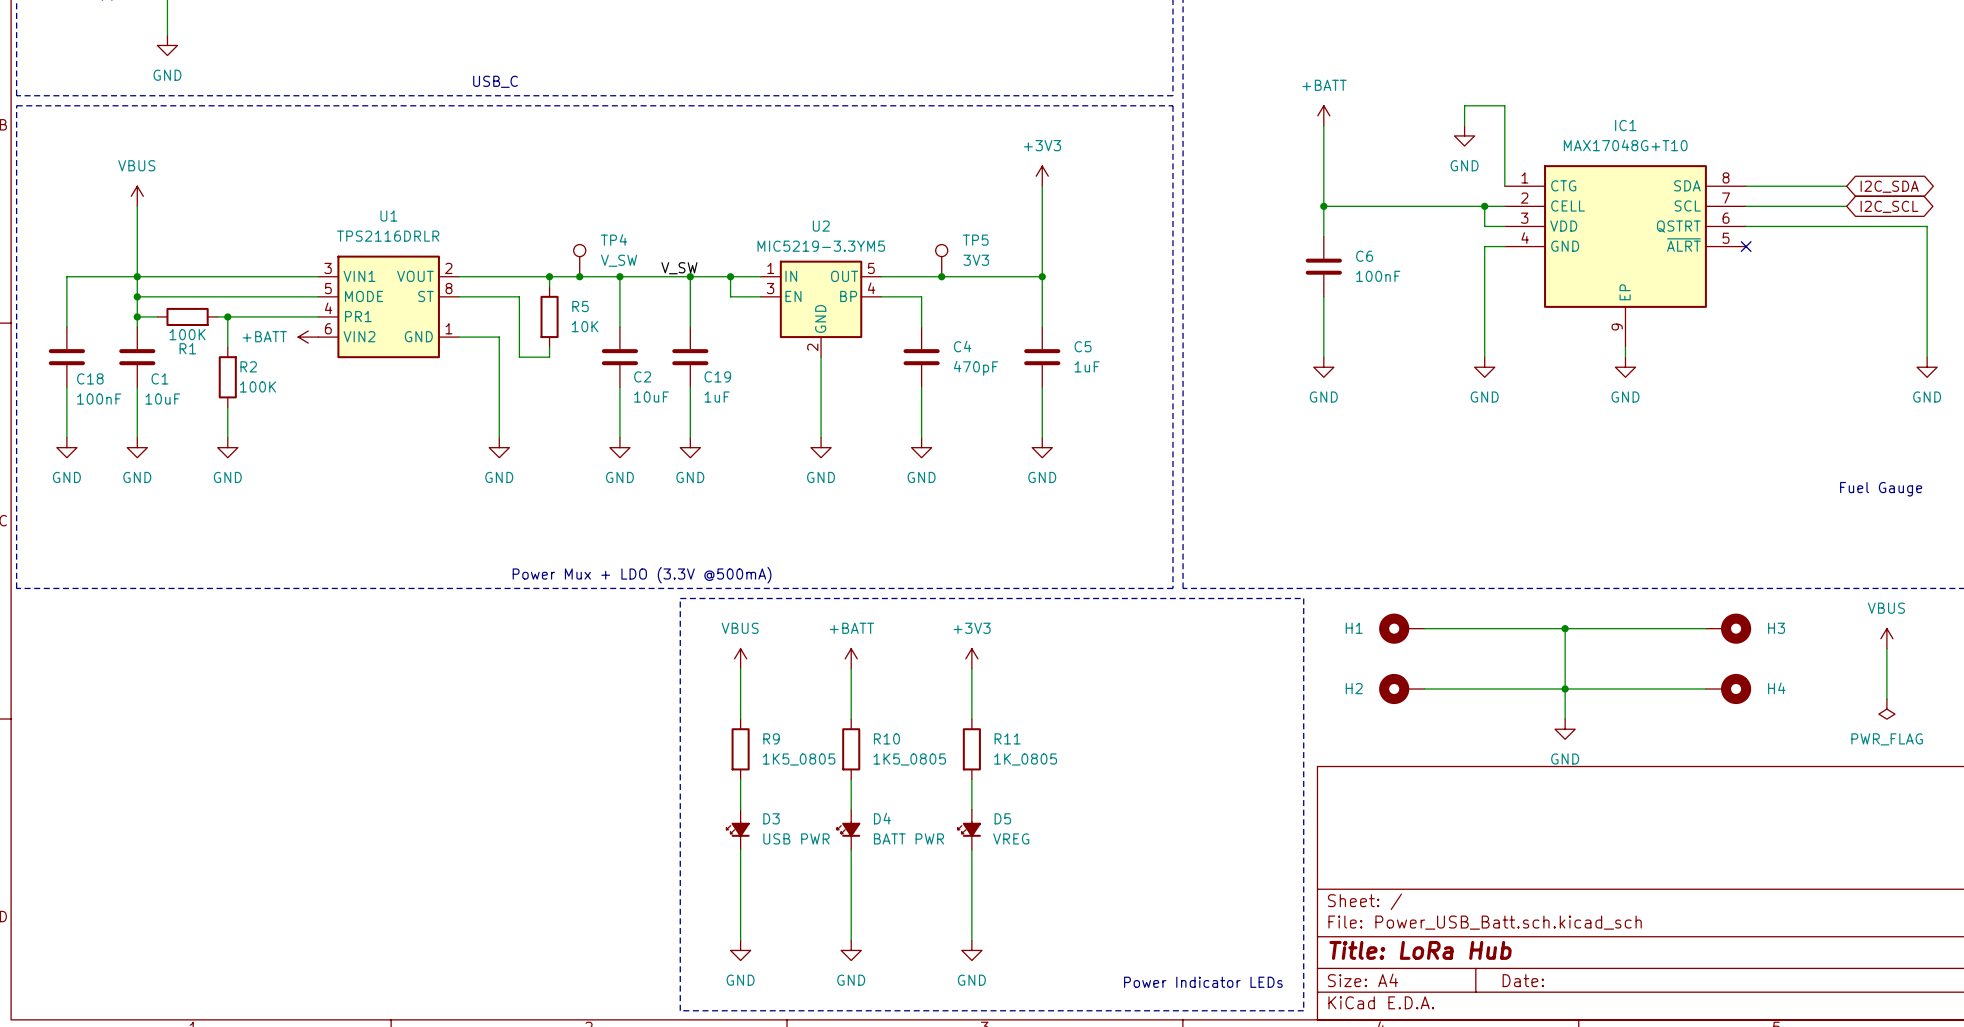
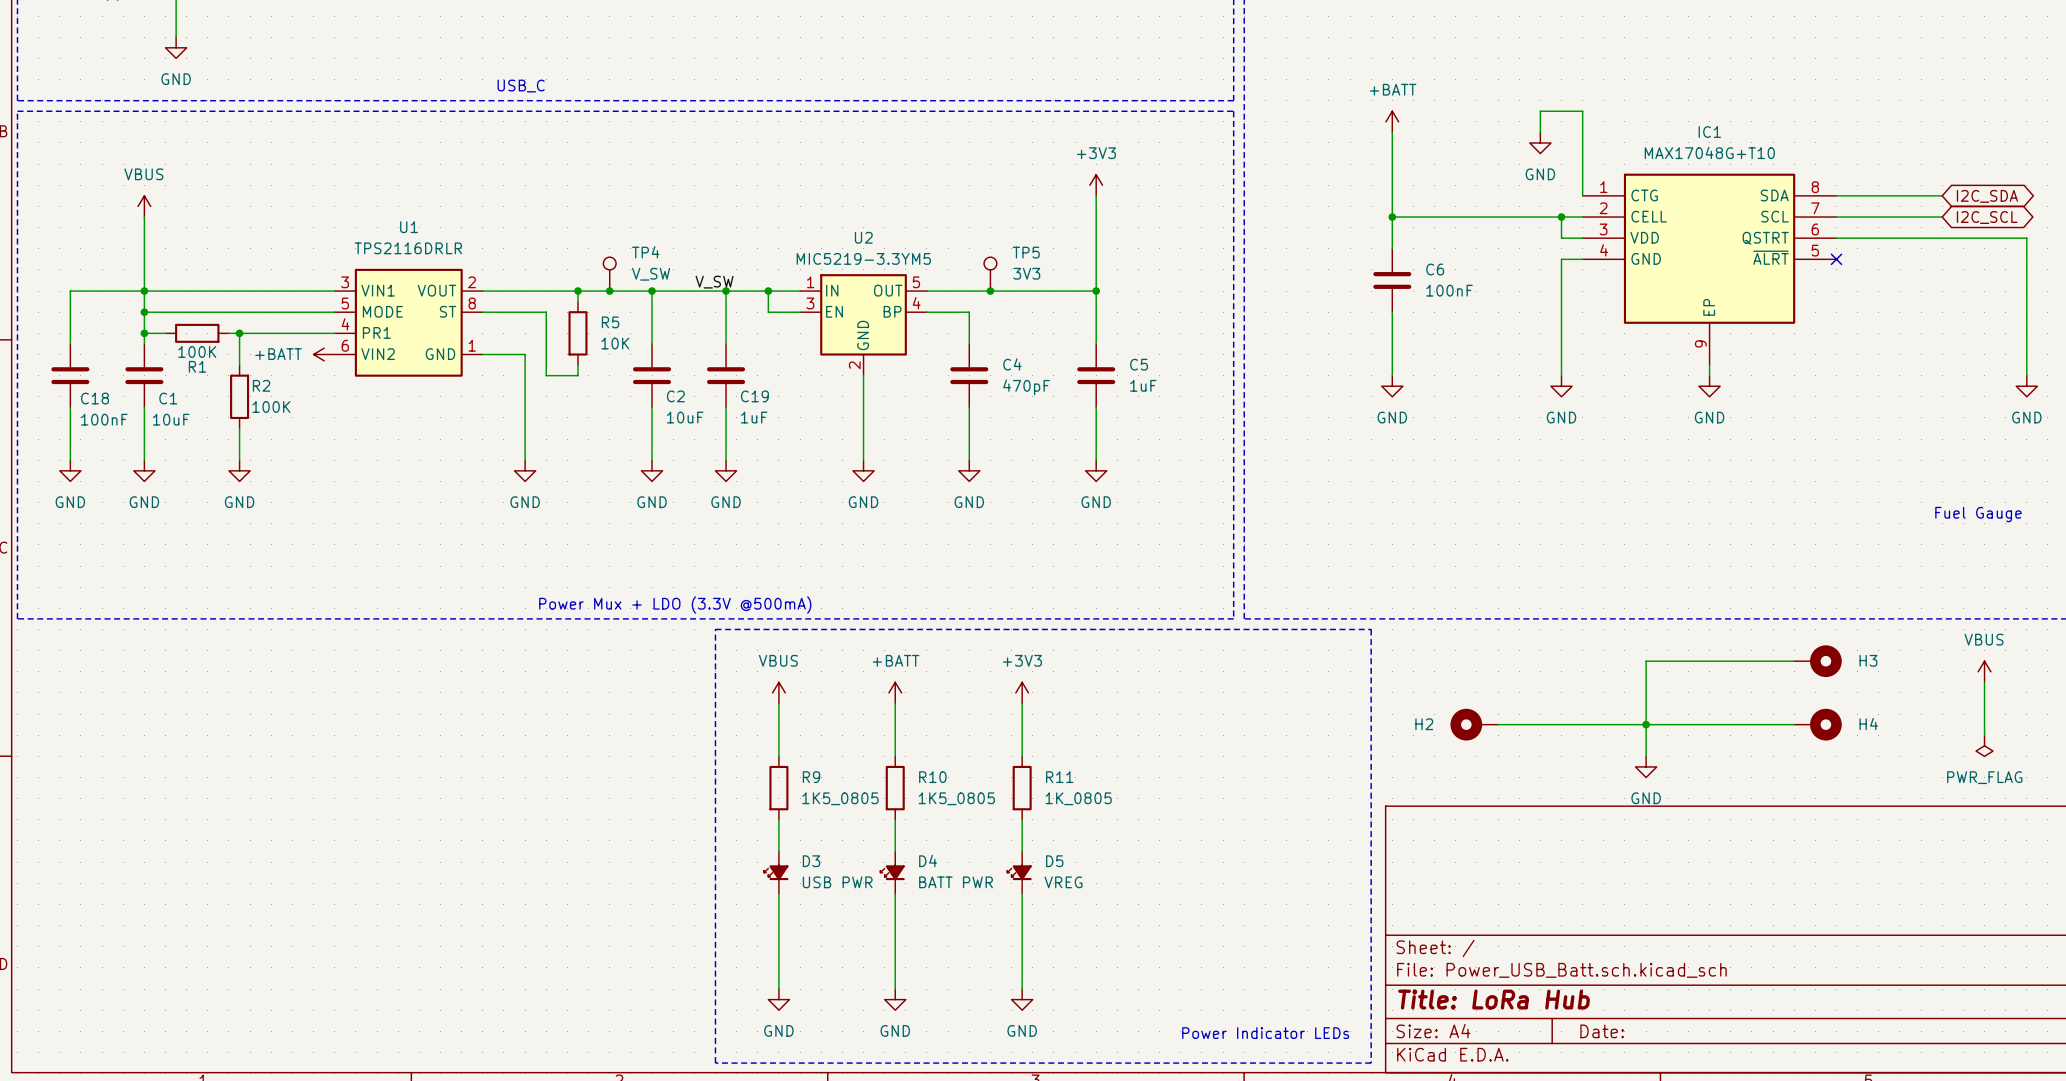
H1: (1401, 628) -> none
wire: (1424, 628) (1565, 628) -> none
junction: (1565, 628) -> none

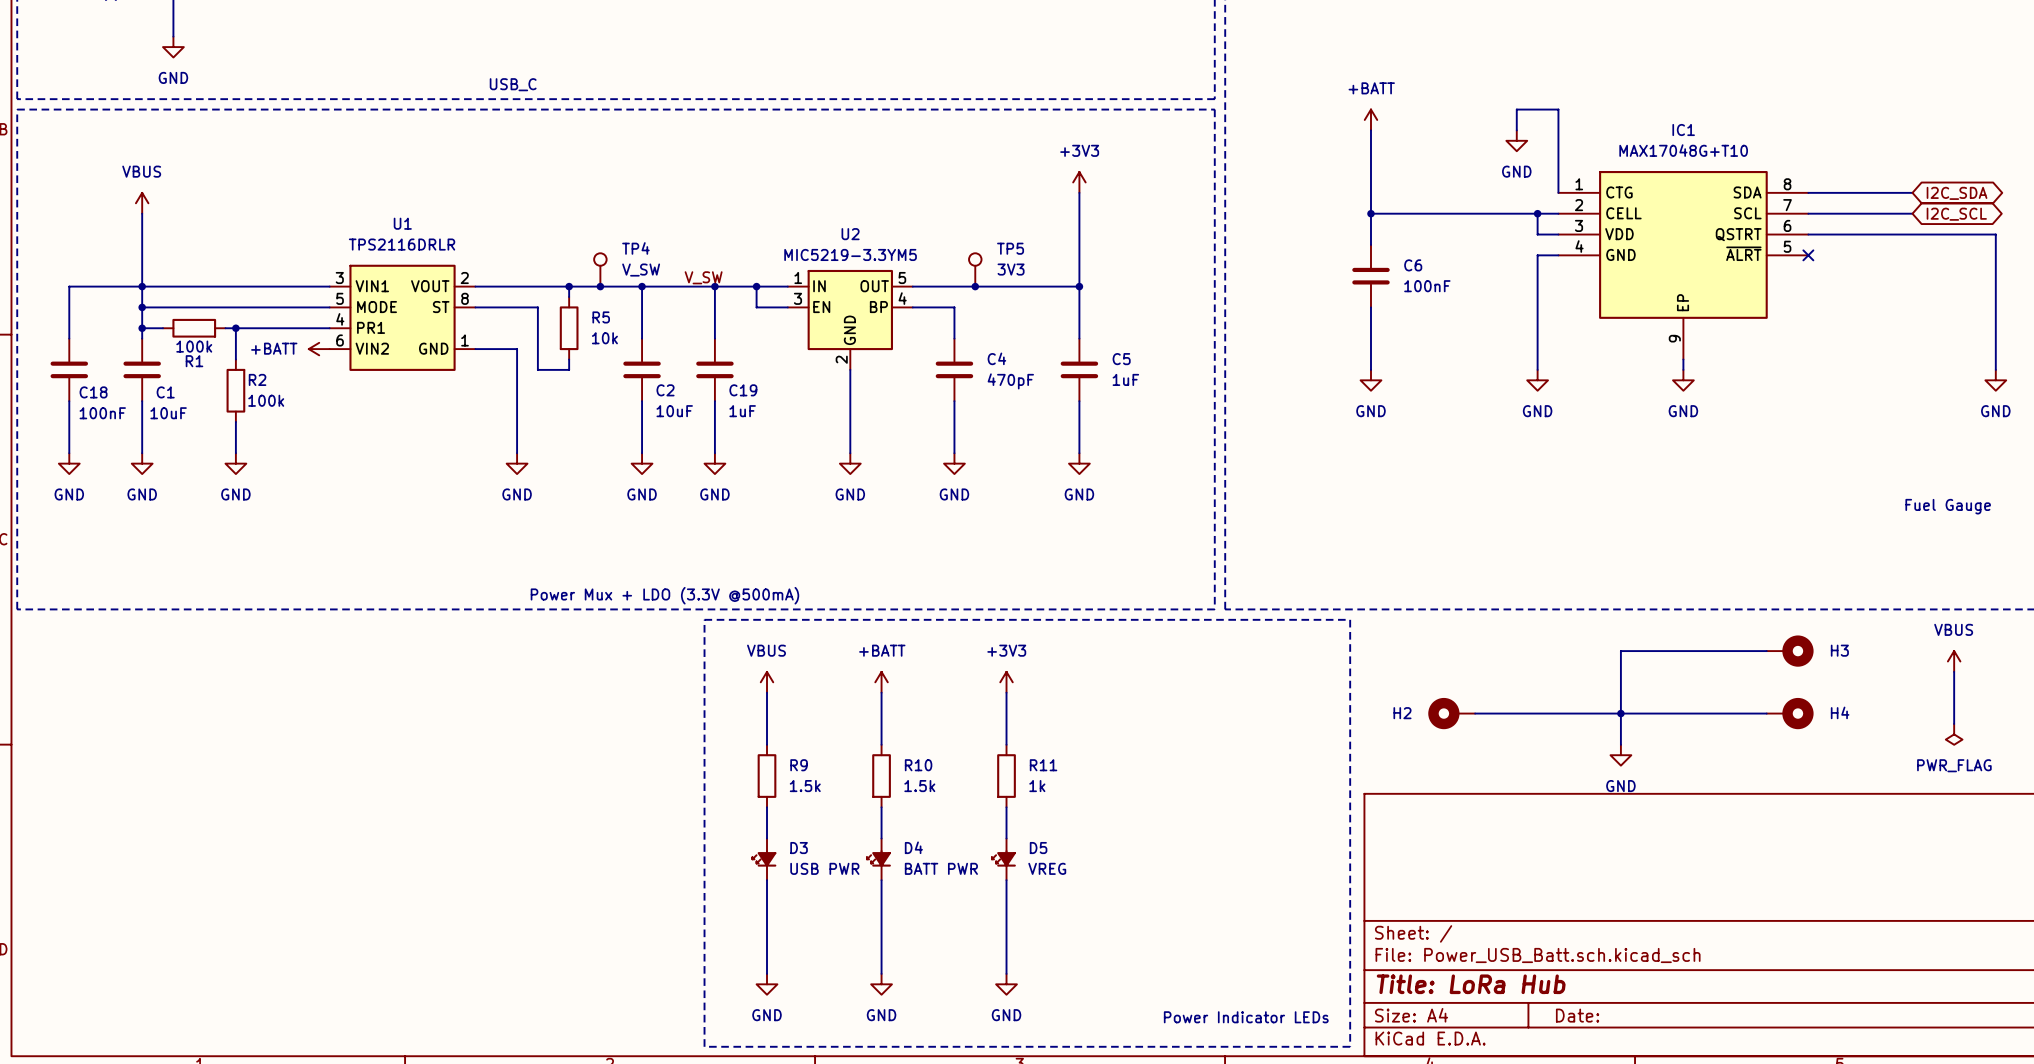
R5 value: 10K (615, 343) -> 10k (604, 338)
R1 value: 100K (197, 351) -> 100k (194, 346)
R2 value: 100K (271, 406) -> 100k (266, 400)
R9 value: 1K5_0805 (840, 798) -> 1.5k (805, 786)
R10 value: 1K5_0805 (956, 798) -> 1.5k (919, 786)
R11 value: 1K_0805 (1078, 798) -> 1k (1037, 786)

